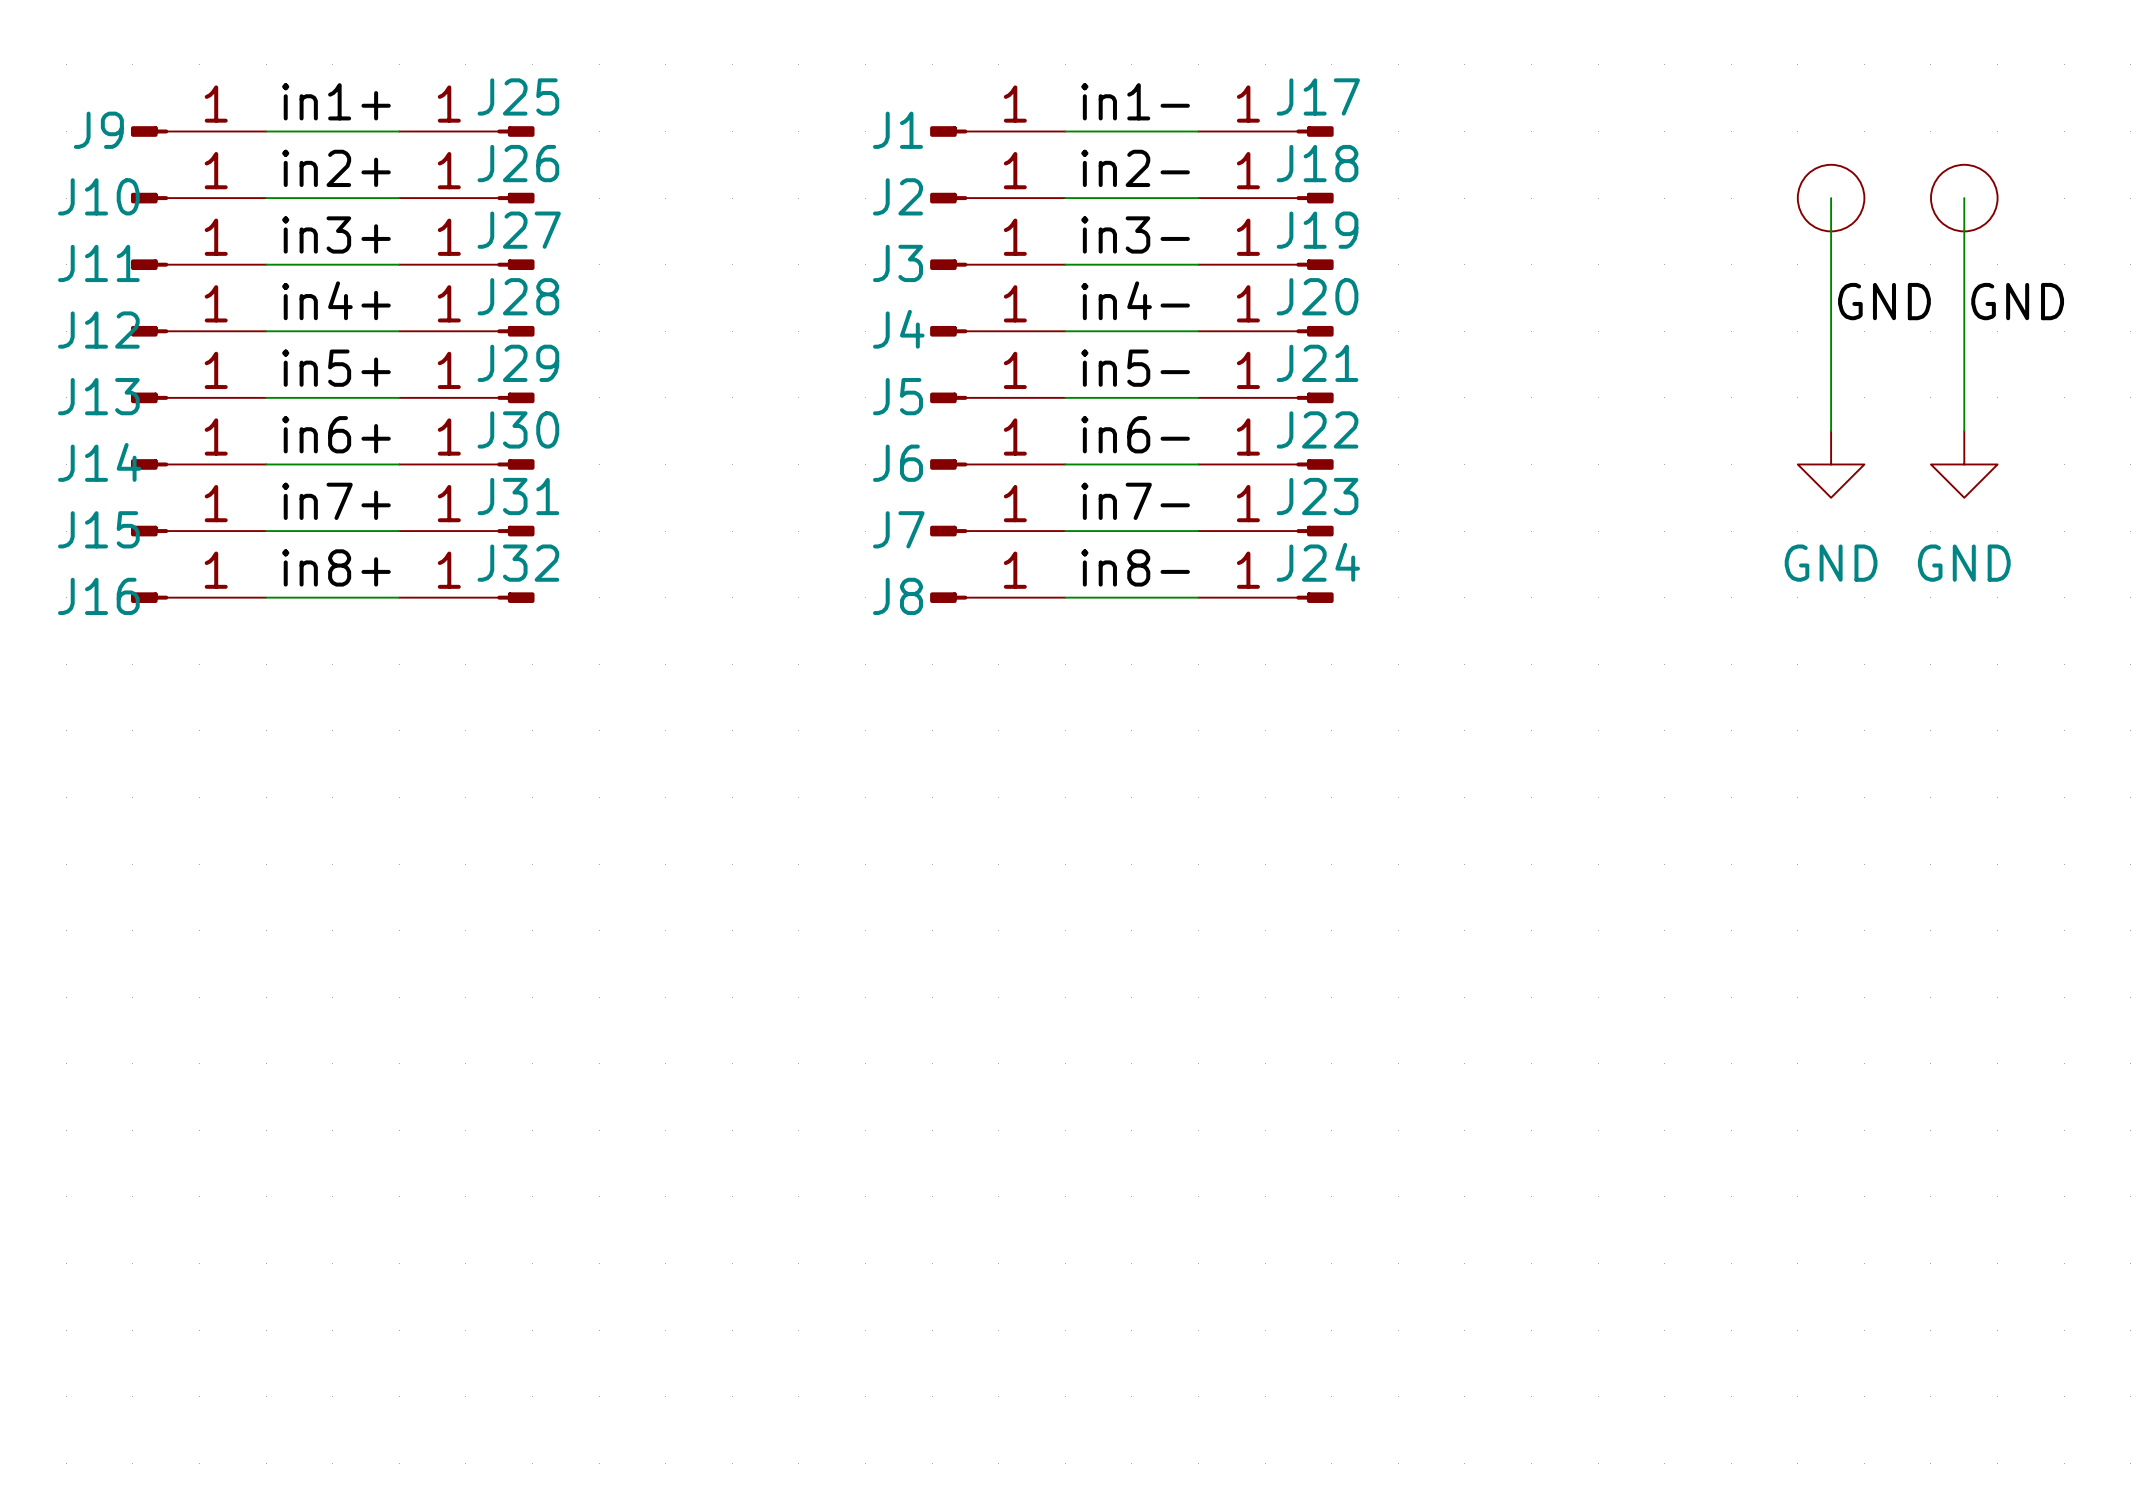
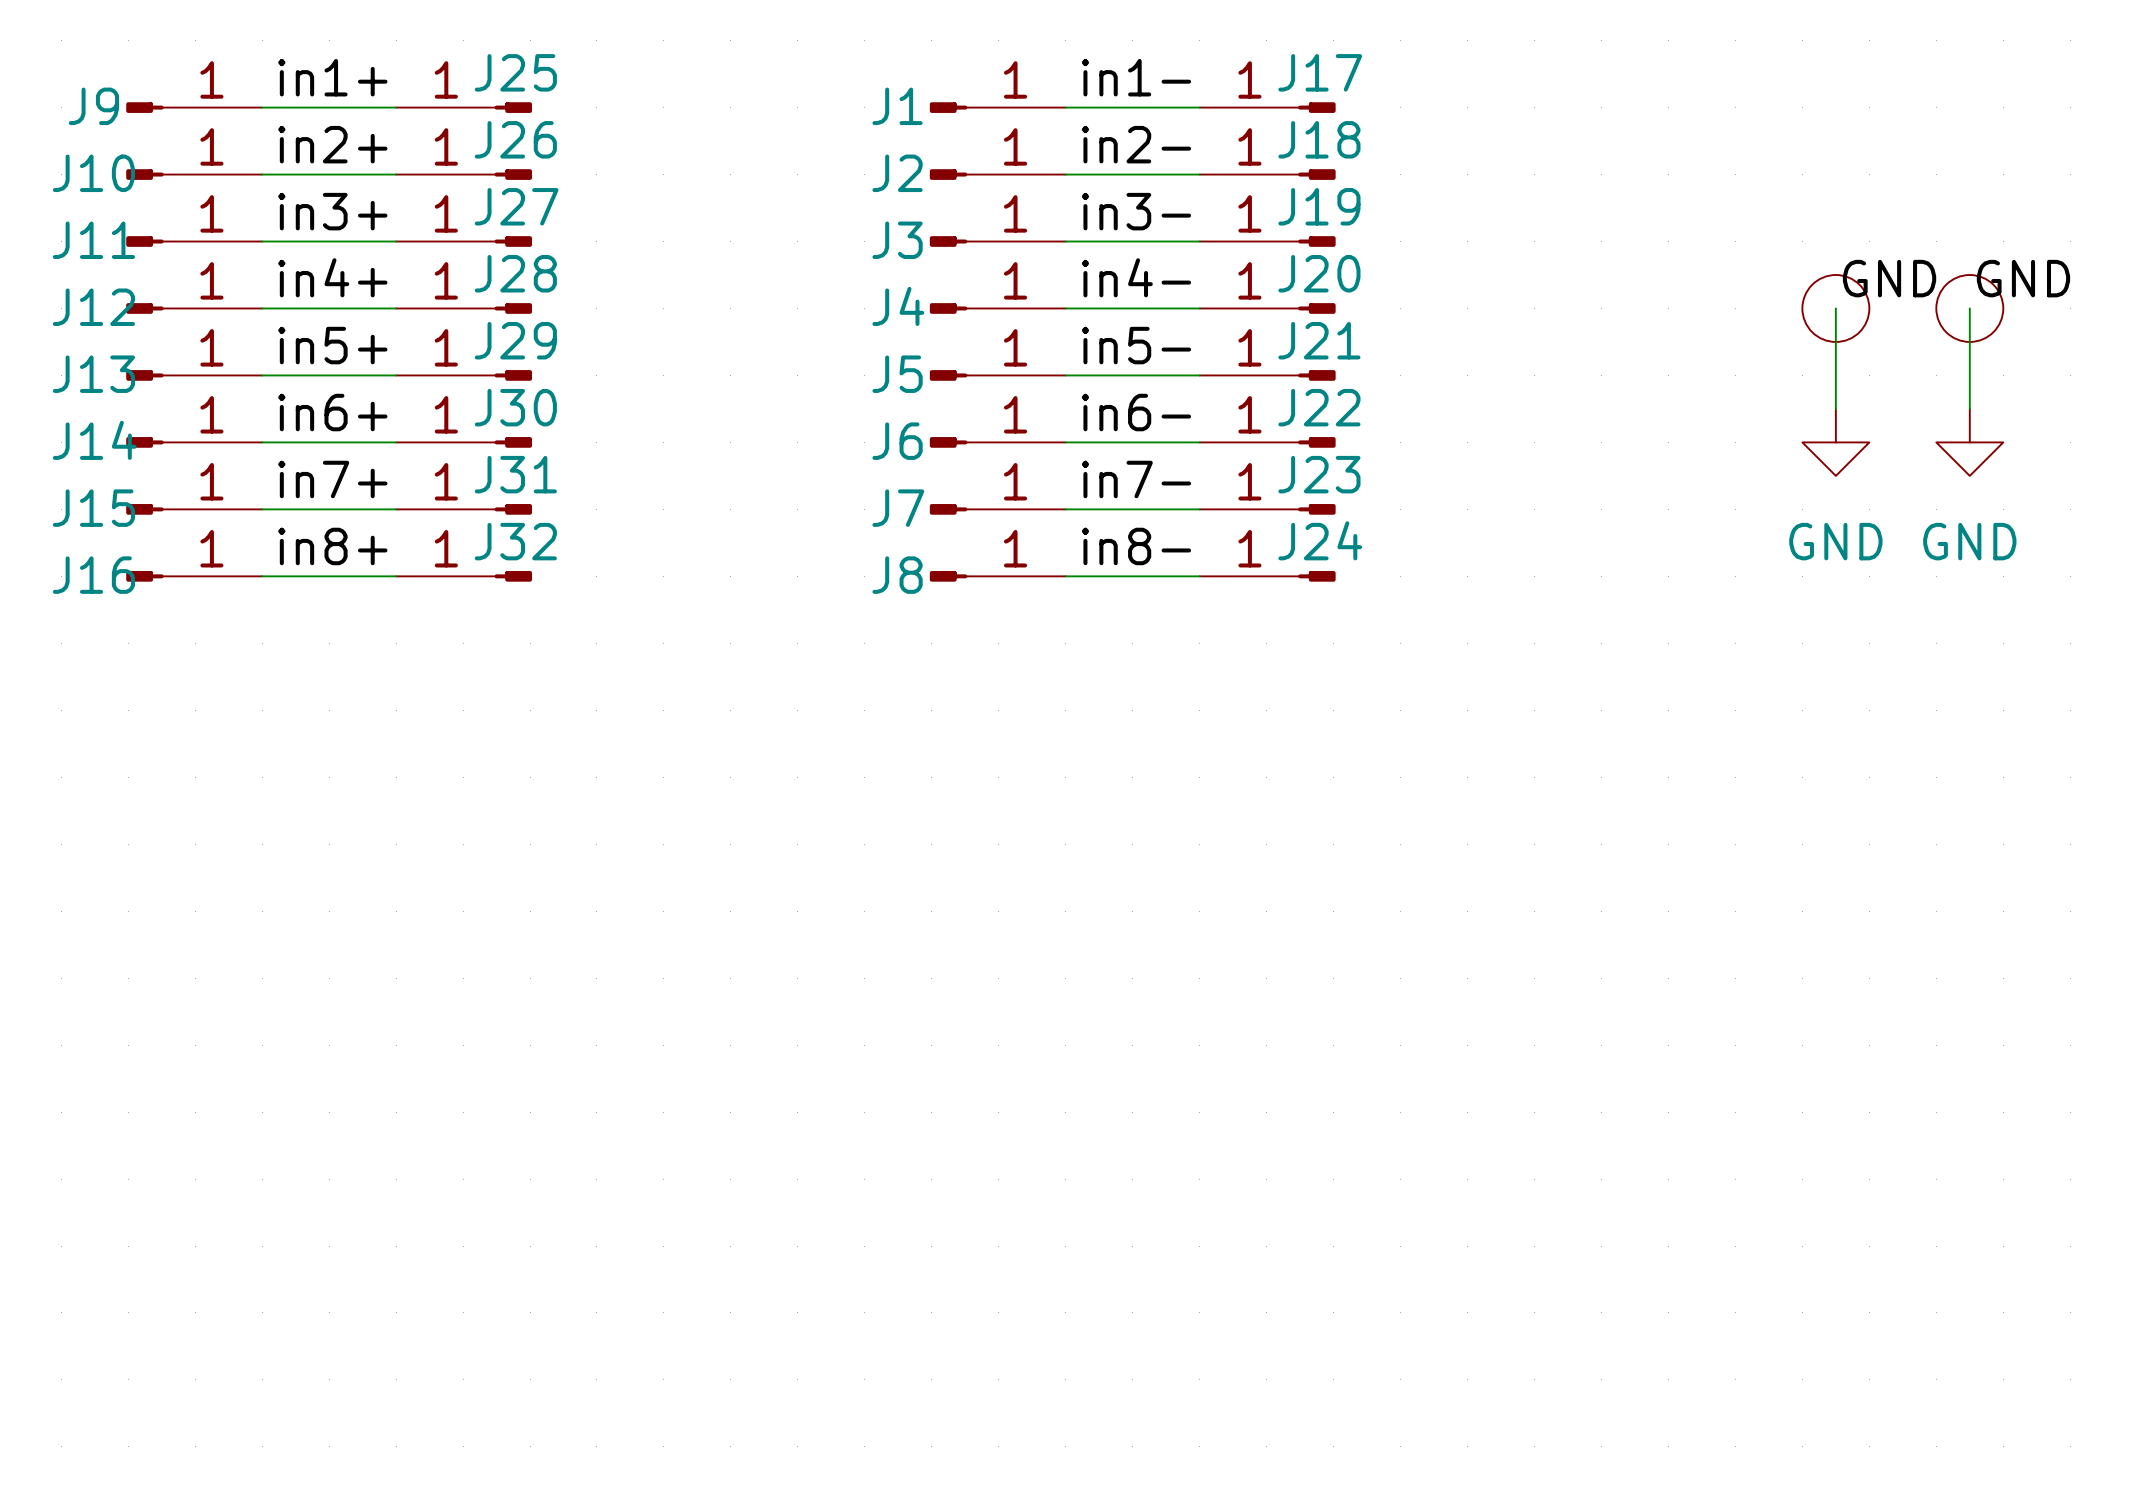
wire: (1831, 198) (1831, 331) -> none
part: (1831, 198) -> none
wire: (1964, 198) (1964, 331) -> none
part: (1964, 198) -> none
part: none -> (1835, 308)
part: none -> (1969, 308)

